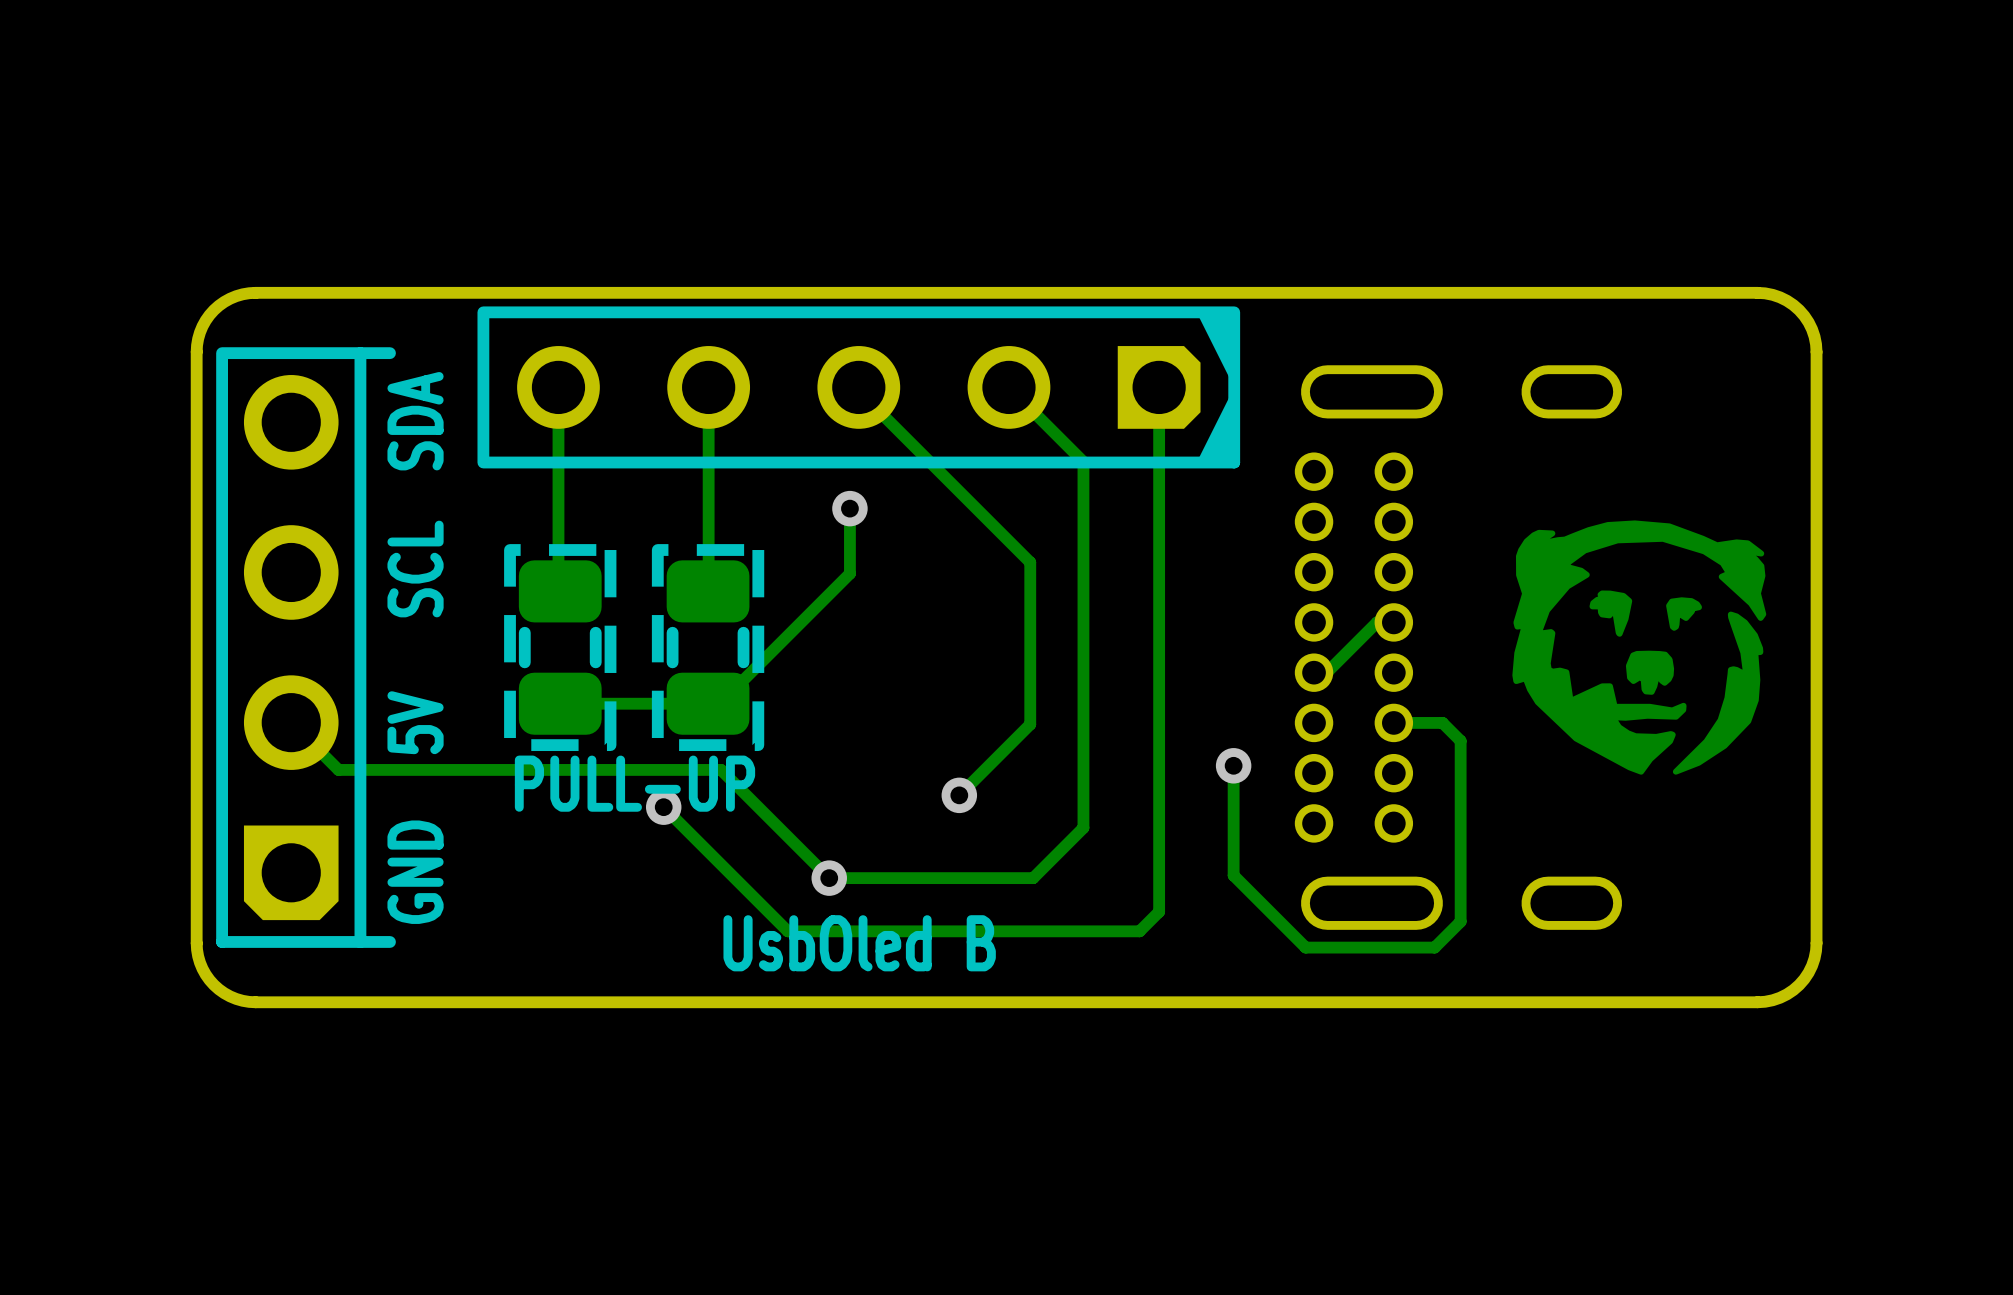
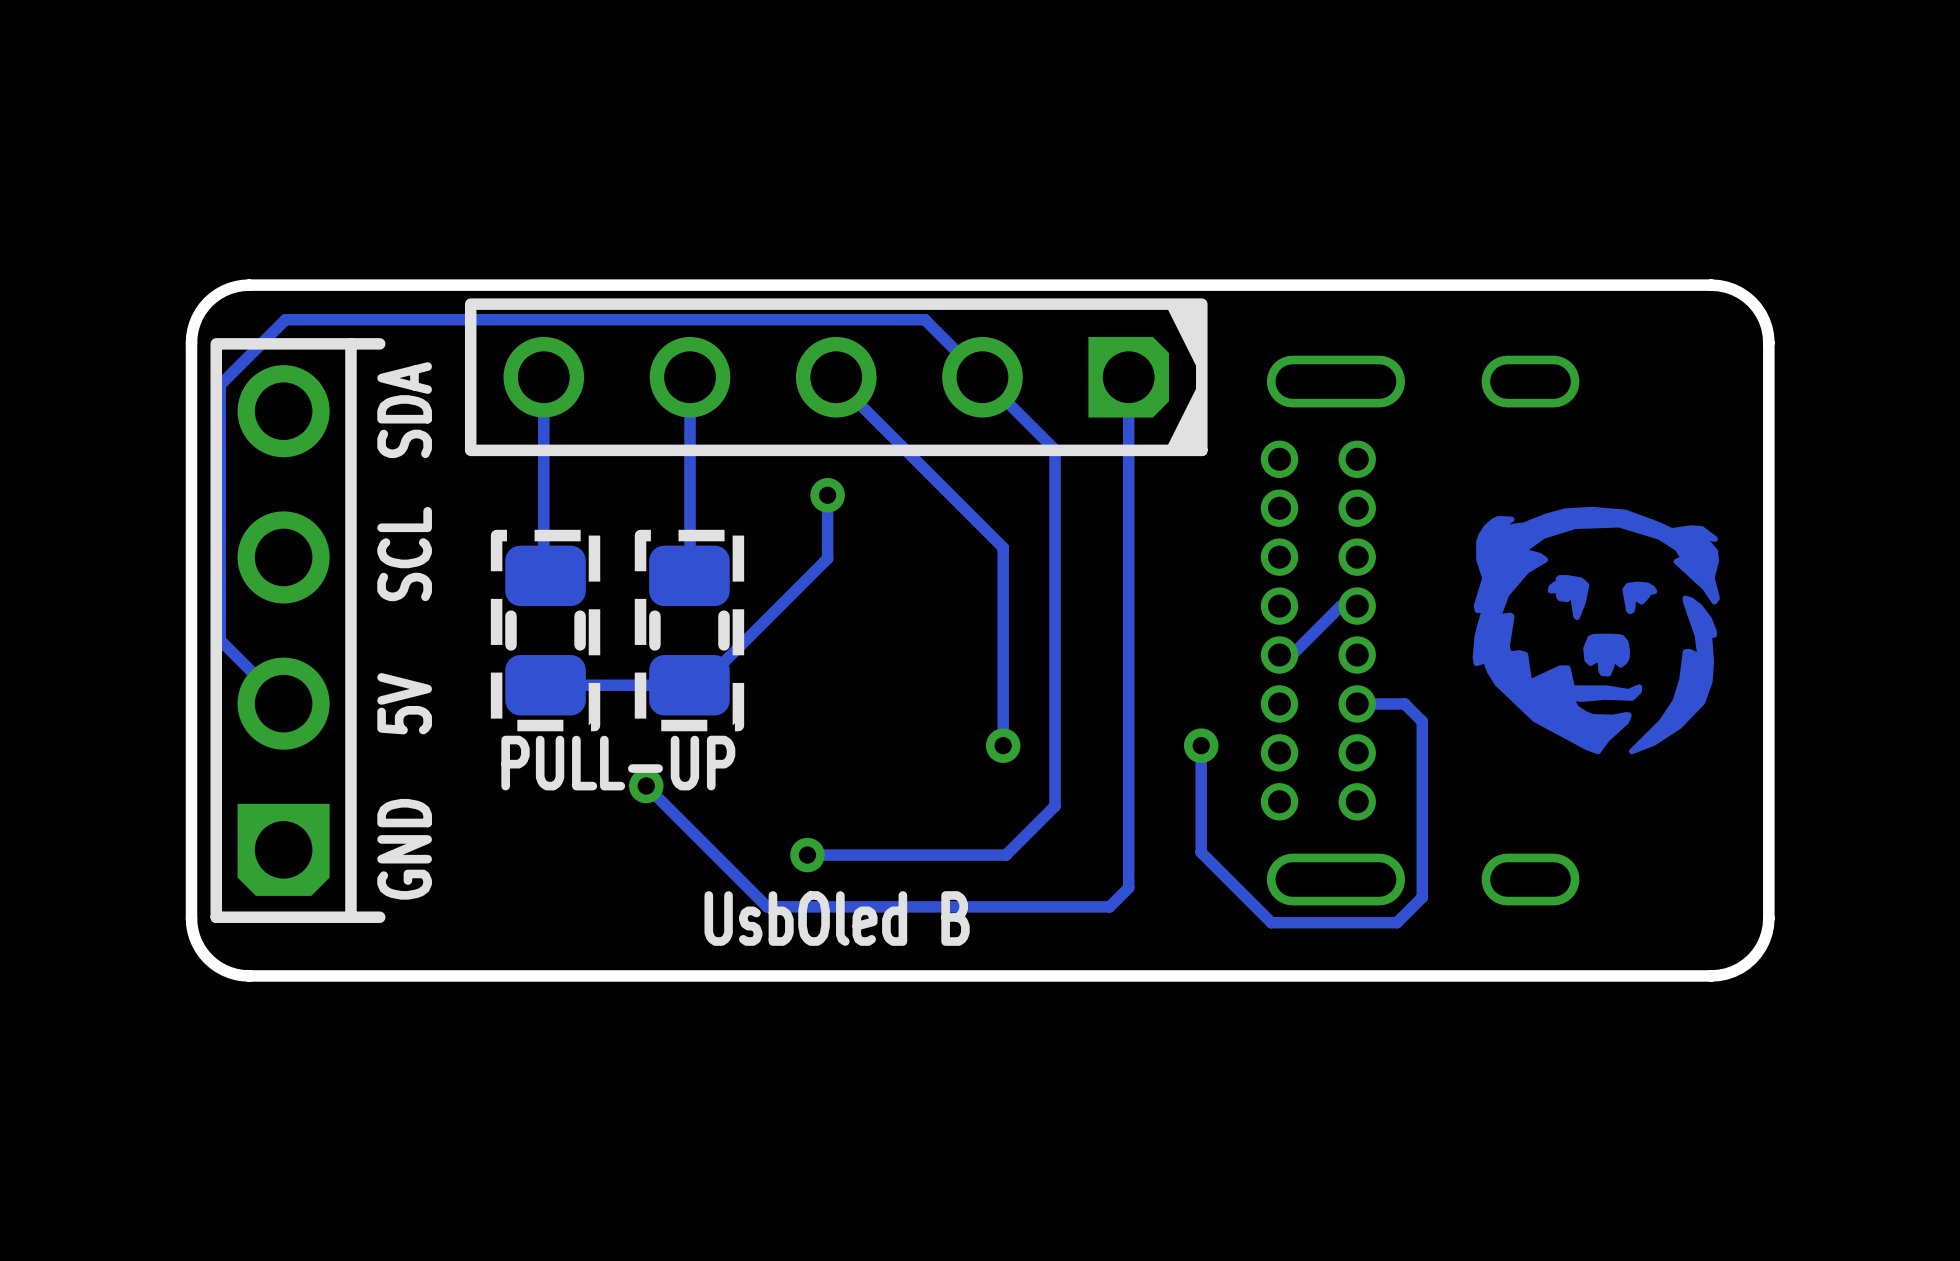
track: (291, 722) (338, 769) (721, 769) (829, 878) -> (283, 703) (220, 640) (220, 384) (285, 319) (924, 319) (982, 377)
track: (1030, 724) (959, 795) -> (1003, 705) (1003, 745)
via position: (959, 795) -> (1003, 745)

